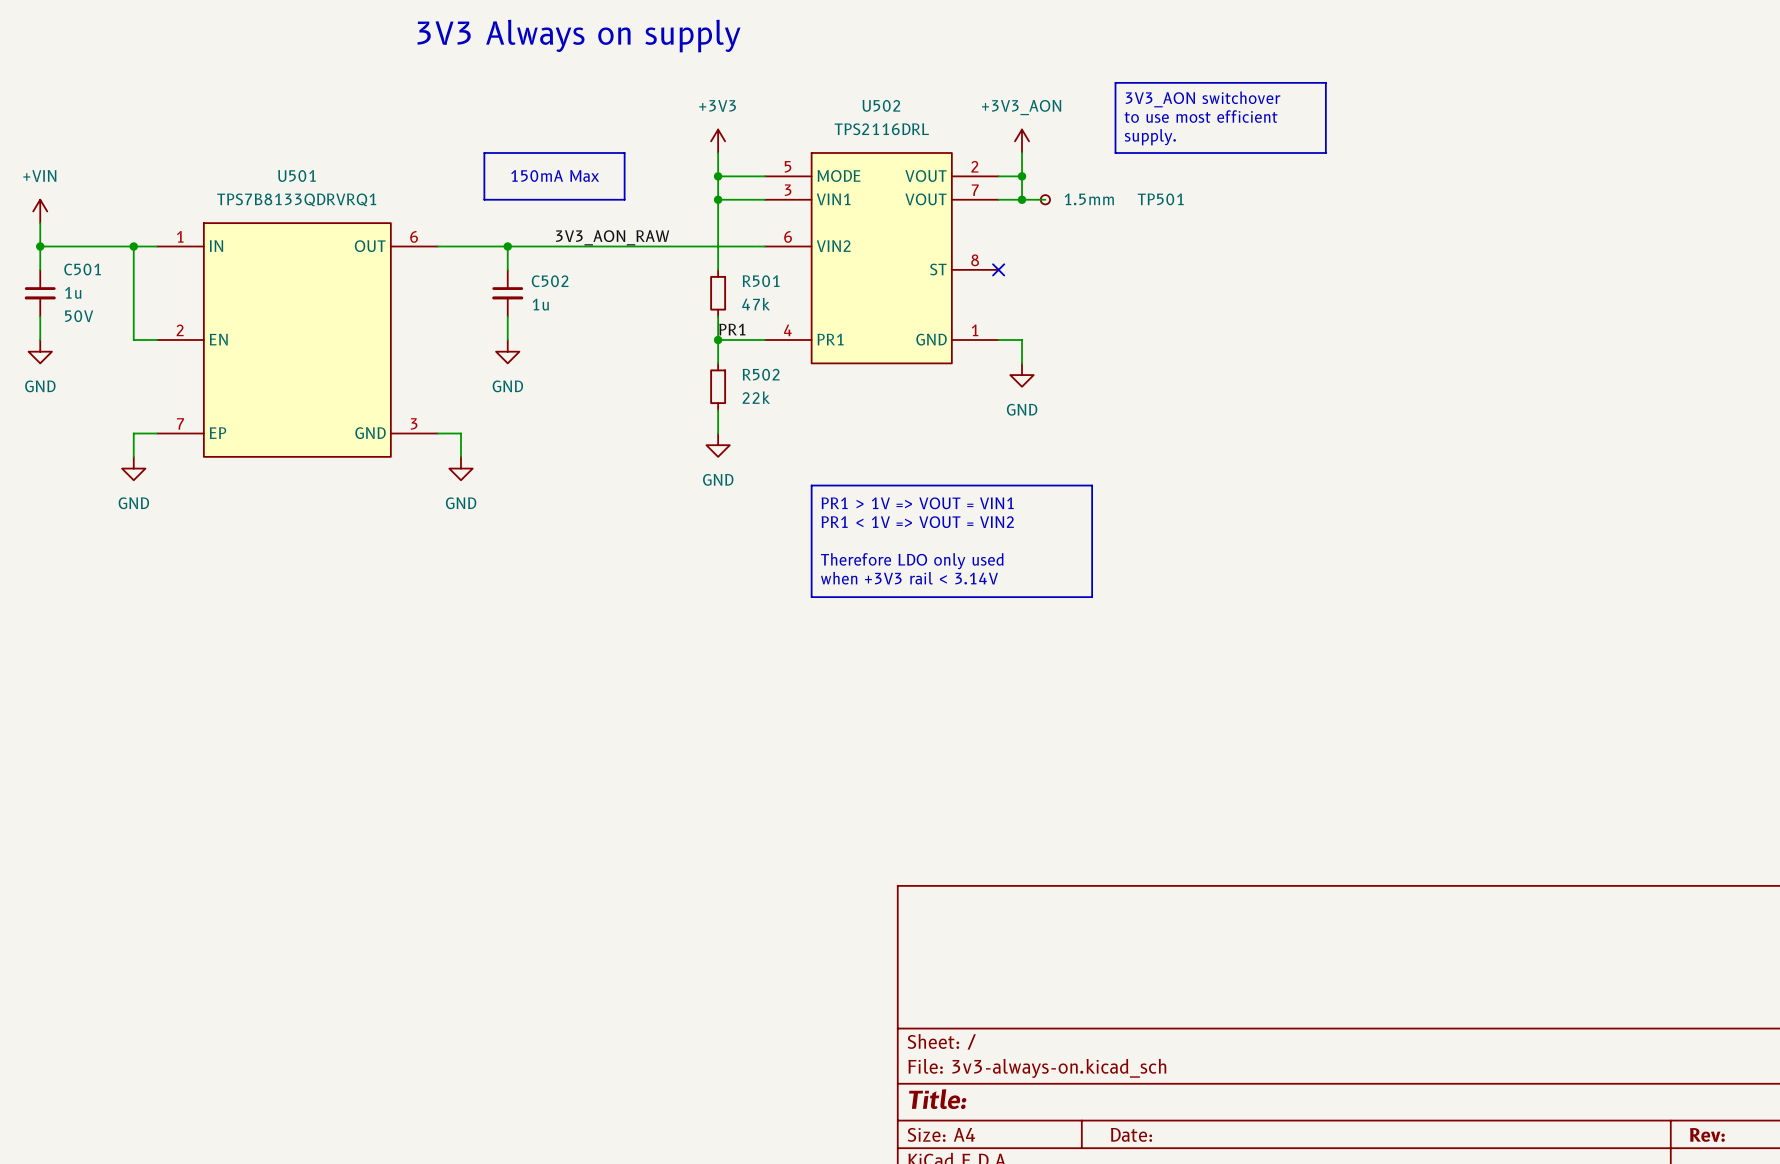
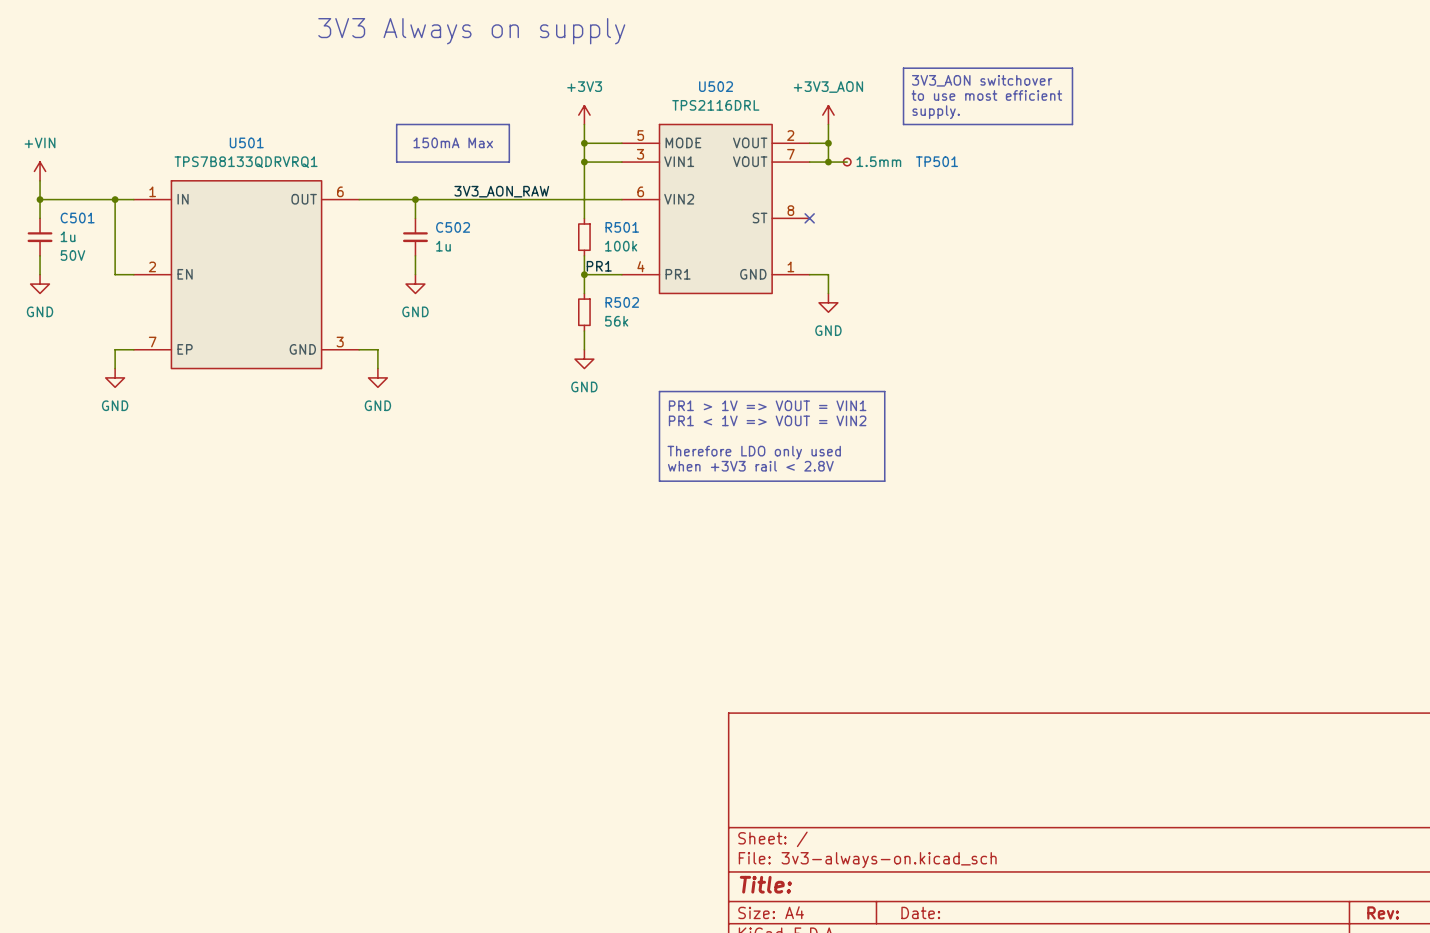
R501 value: 47k (756, 304) -> 100k (621, 246)
R502 value: 22k (756, 397) -> 56k (616, 321)
text: when +3V3 rail < 3.14V (909, 578) -> when +3V3 rail < 2.8V (750, 466)

